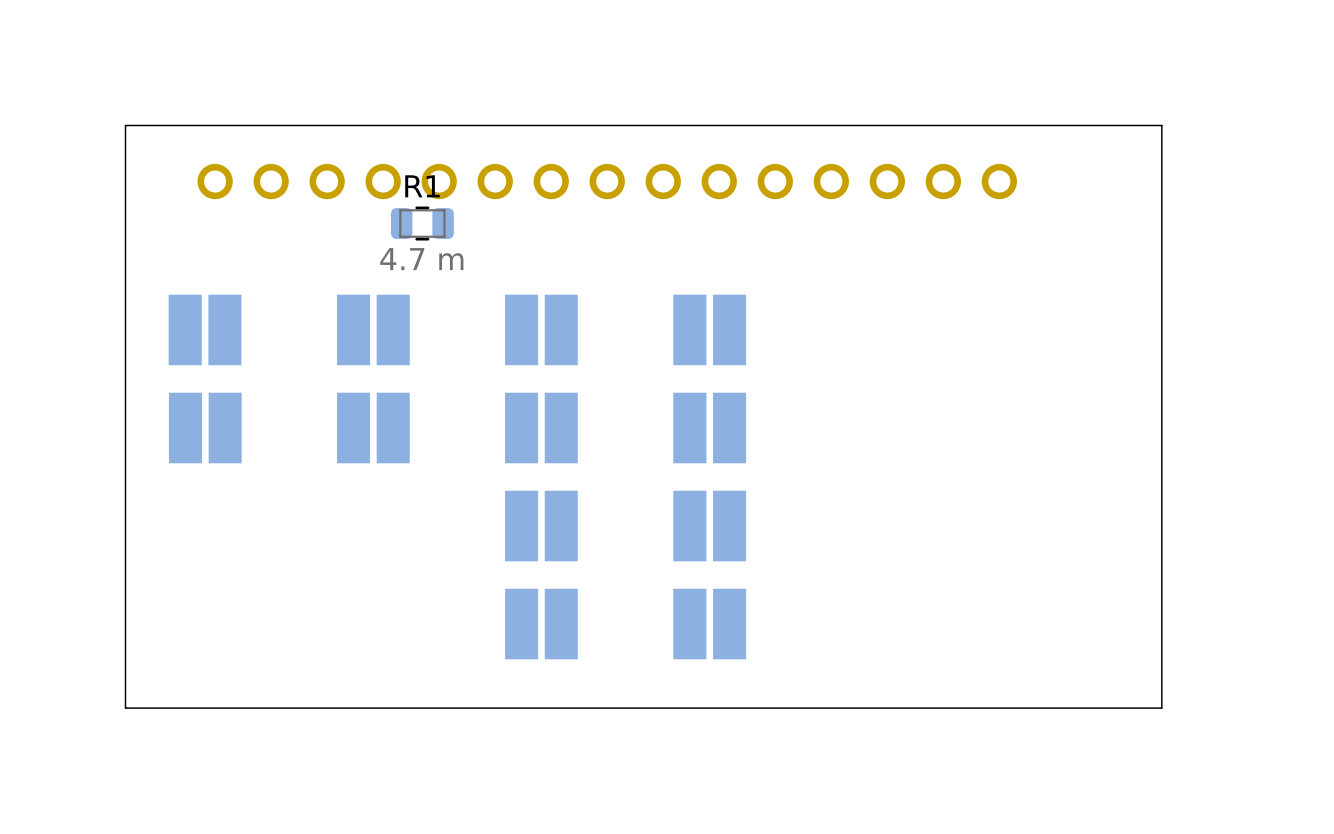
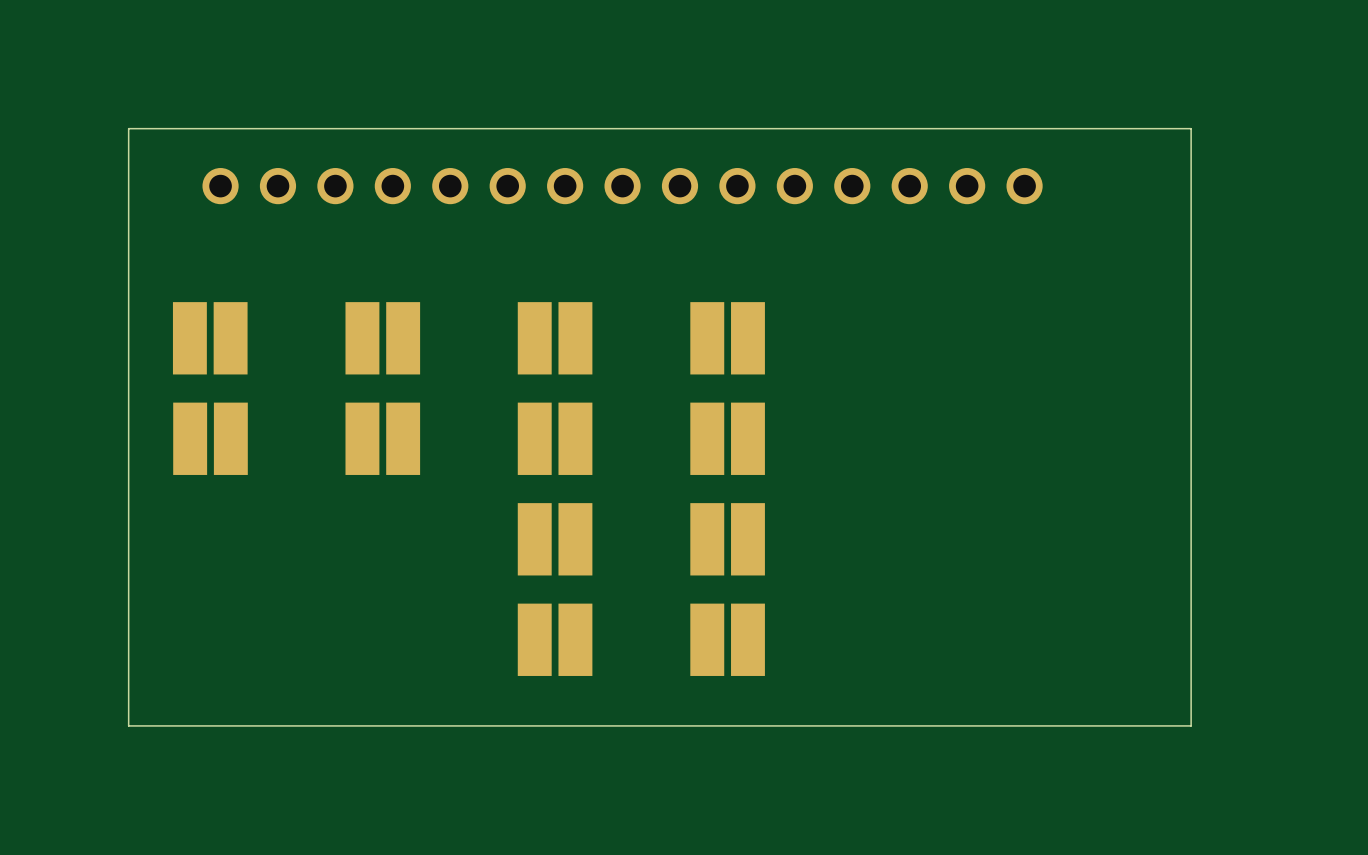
R1: 4.7 m (422, 223) -> none

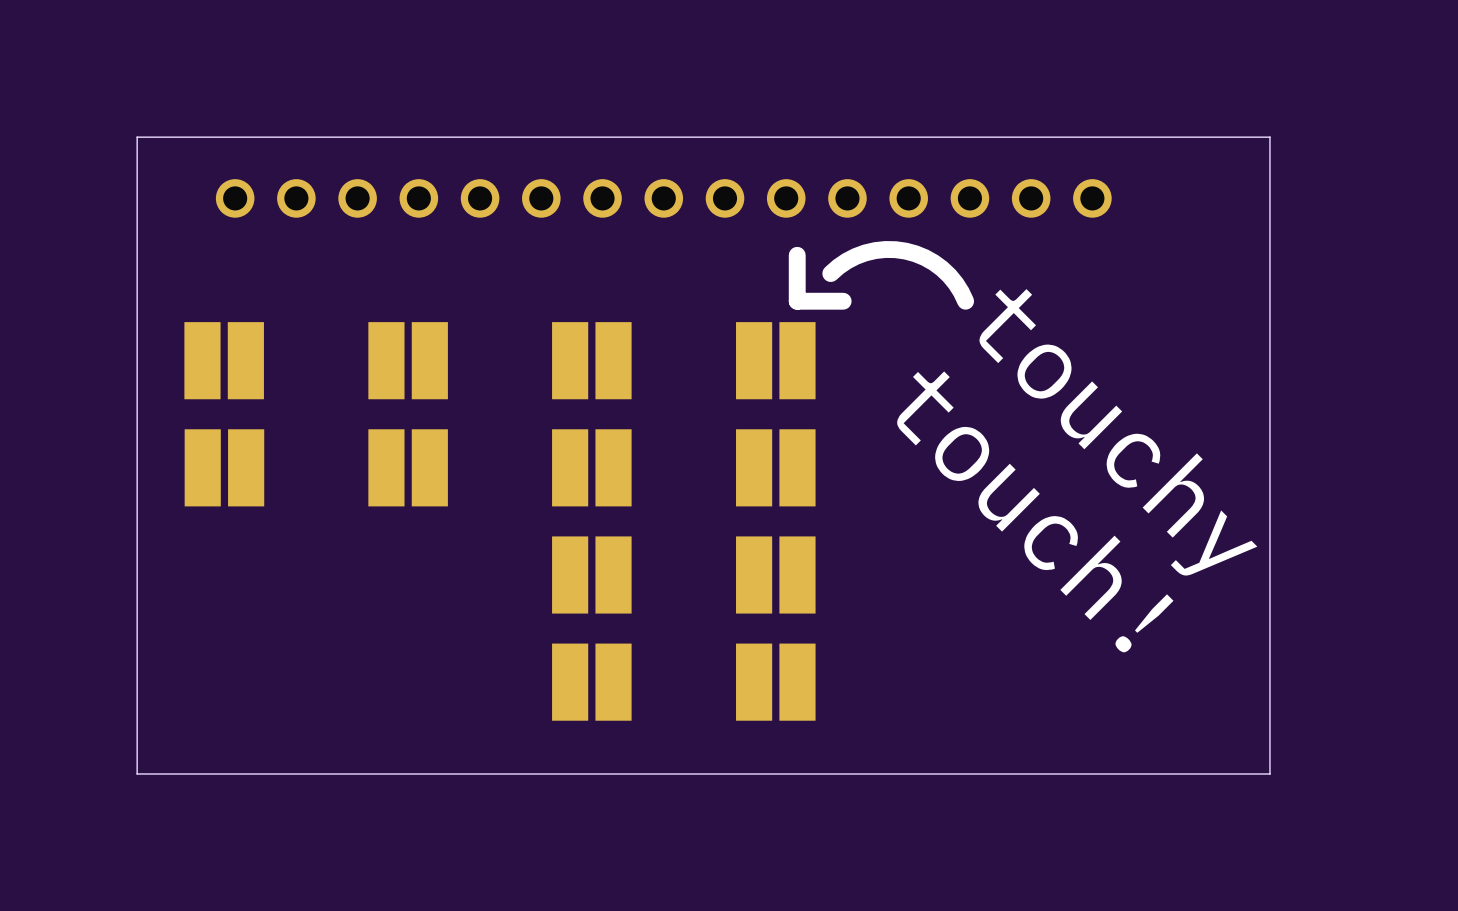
line: none -> (797, 255) (797, 301) (843, 301)
line: none -> (830, 273) (846, 261) (865, 252) (885, 249) (905, 251) (924, 257) (941, 268) (955, 283) (965, 301)
text: none -> touchy (1118, 432)
text: none -> touch! (1035, 511)

